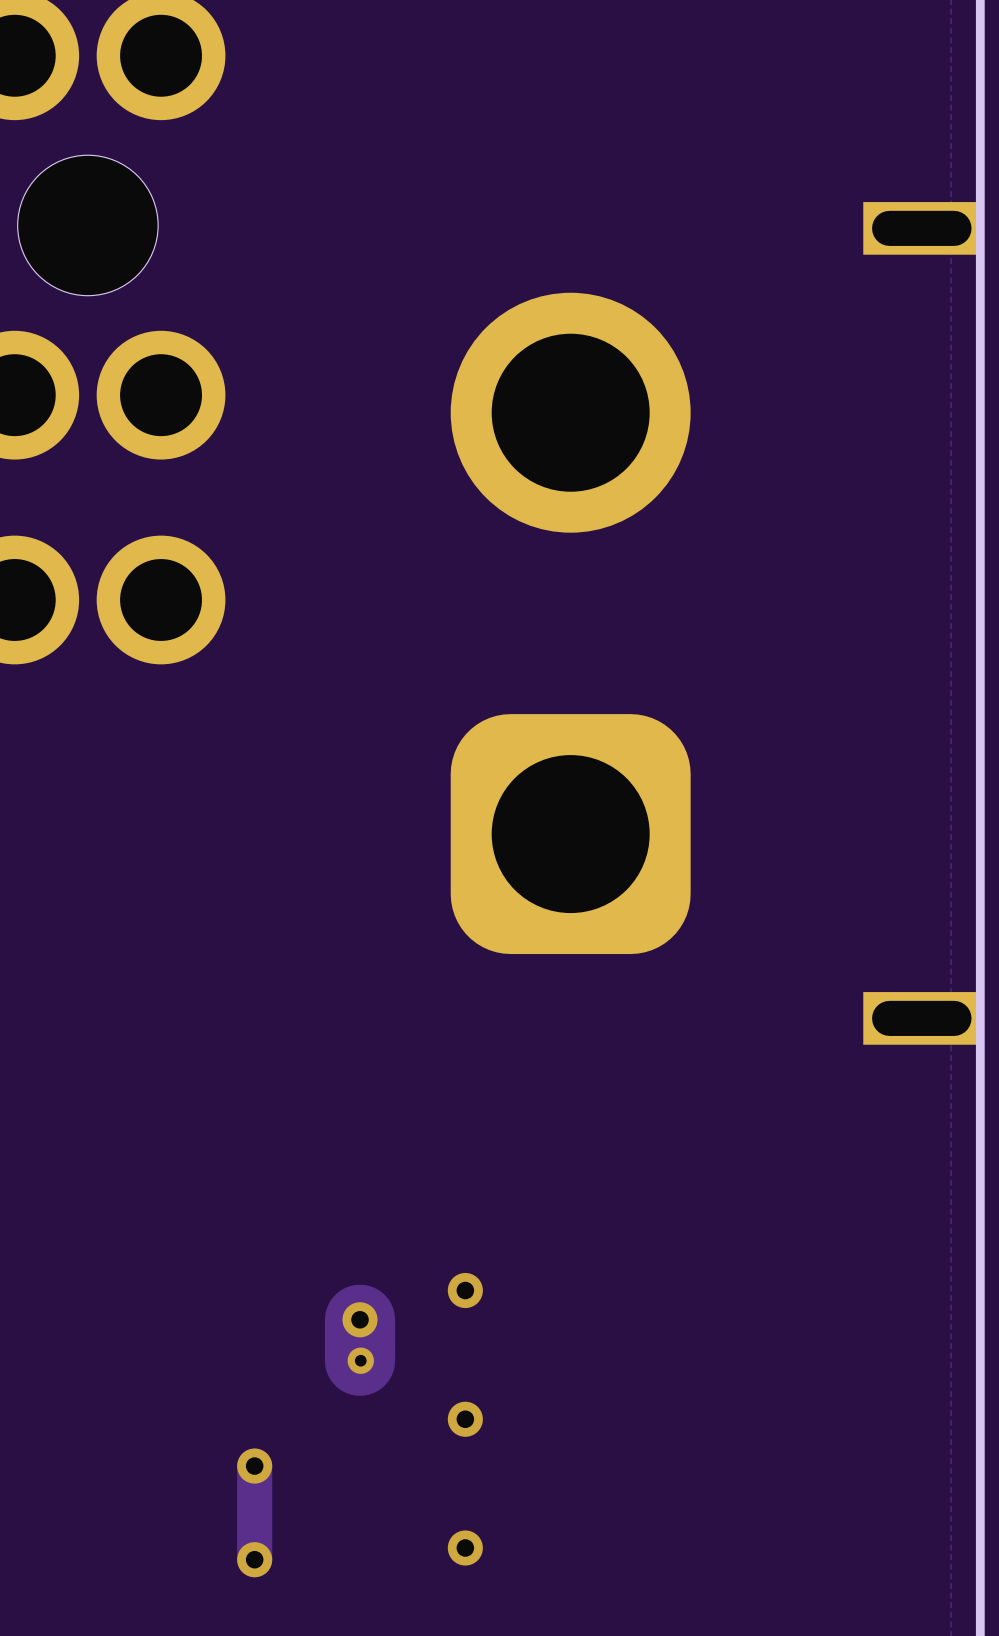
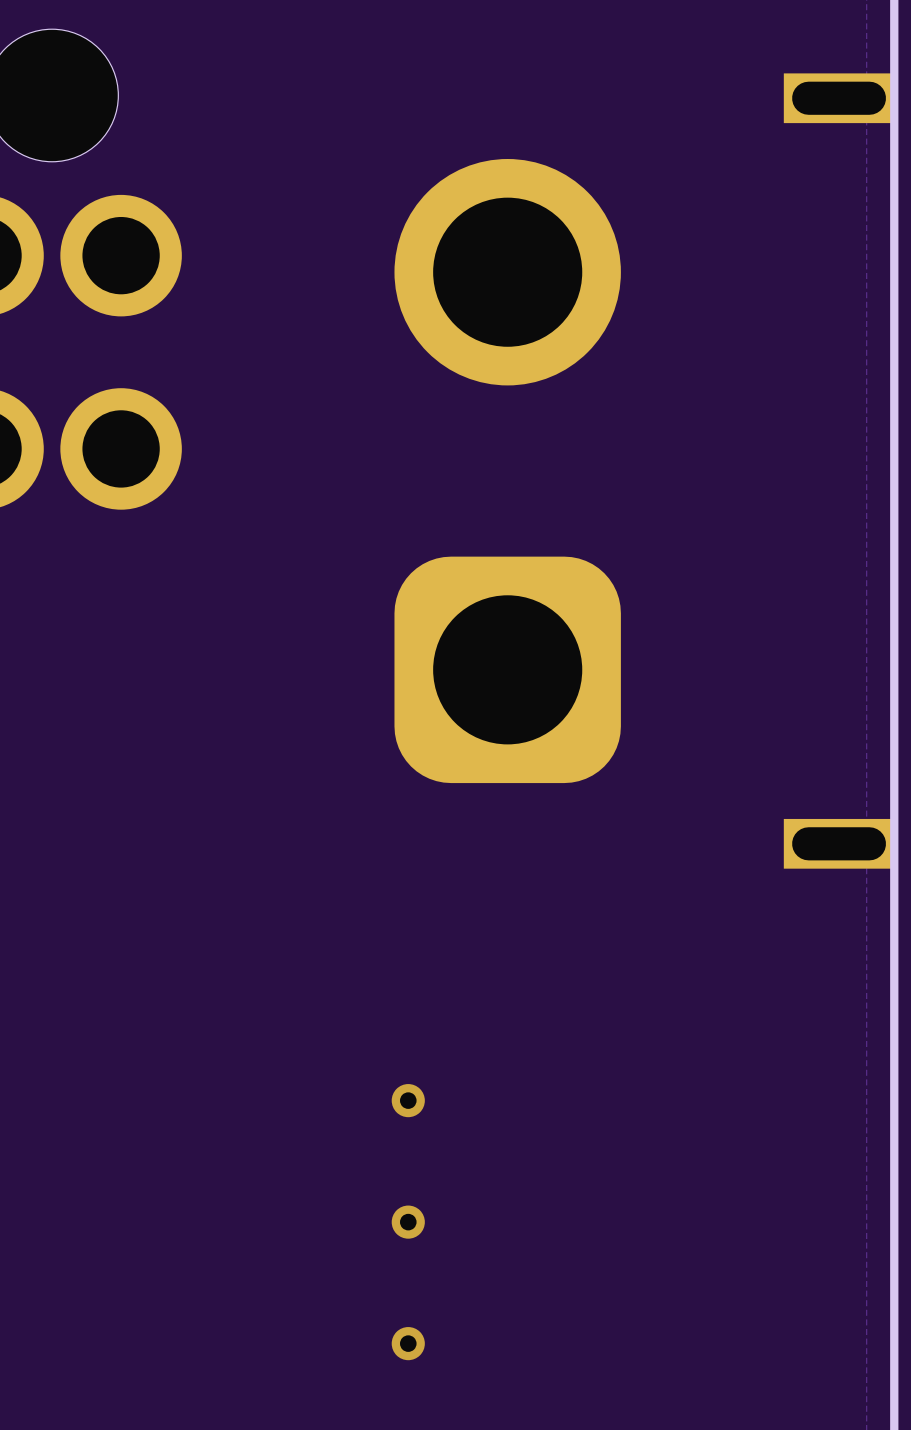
track: (360, 1319) (360, 1360) -> none
via: (360, 1319) -> none
via: (360, 1360) -> none
track: (254, 1466) (254, 1559) -> none
via: (254, 1466) -> none
via: (254, 1559) -> none

